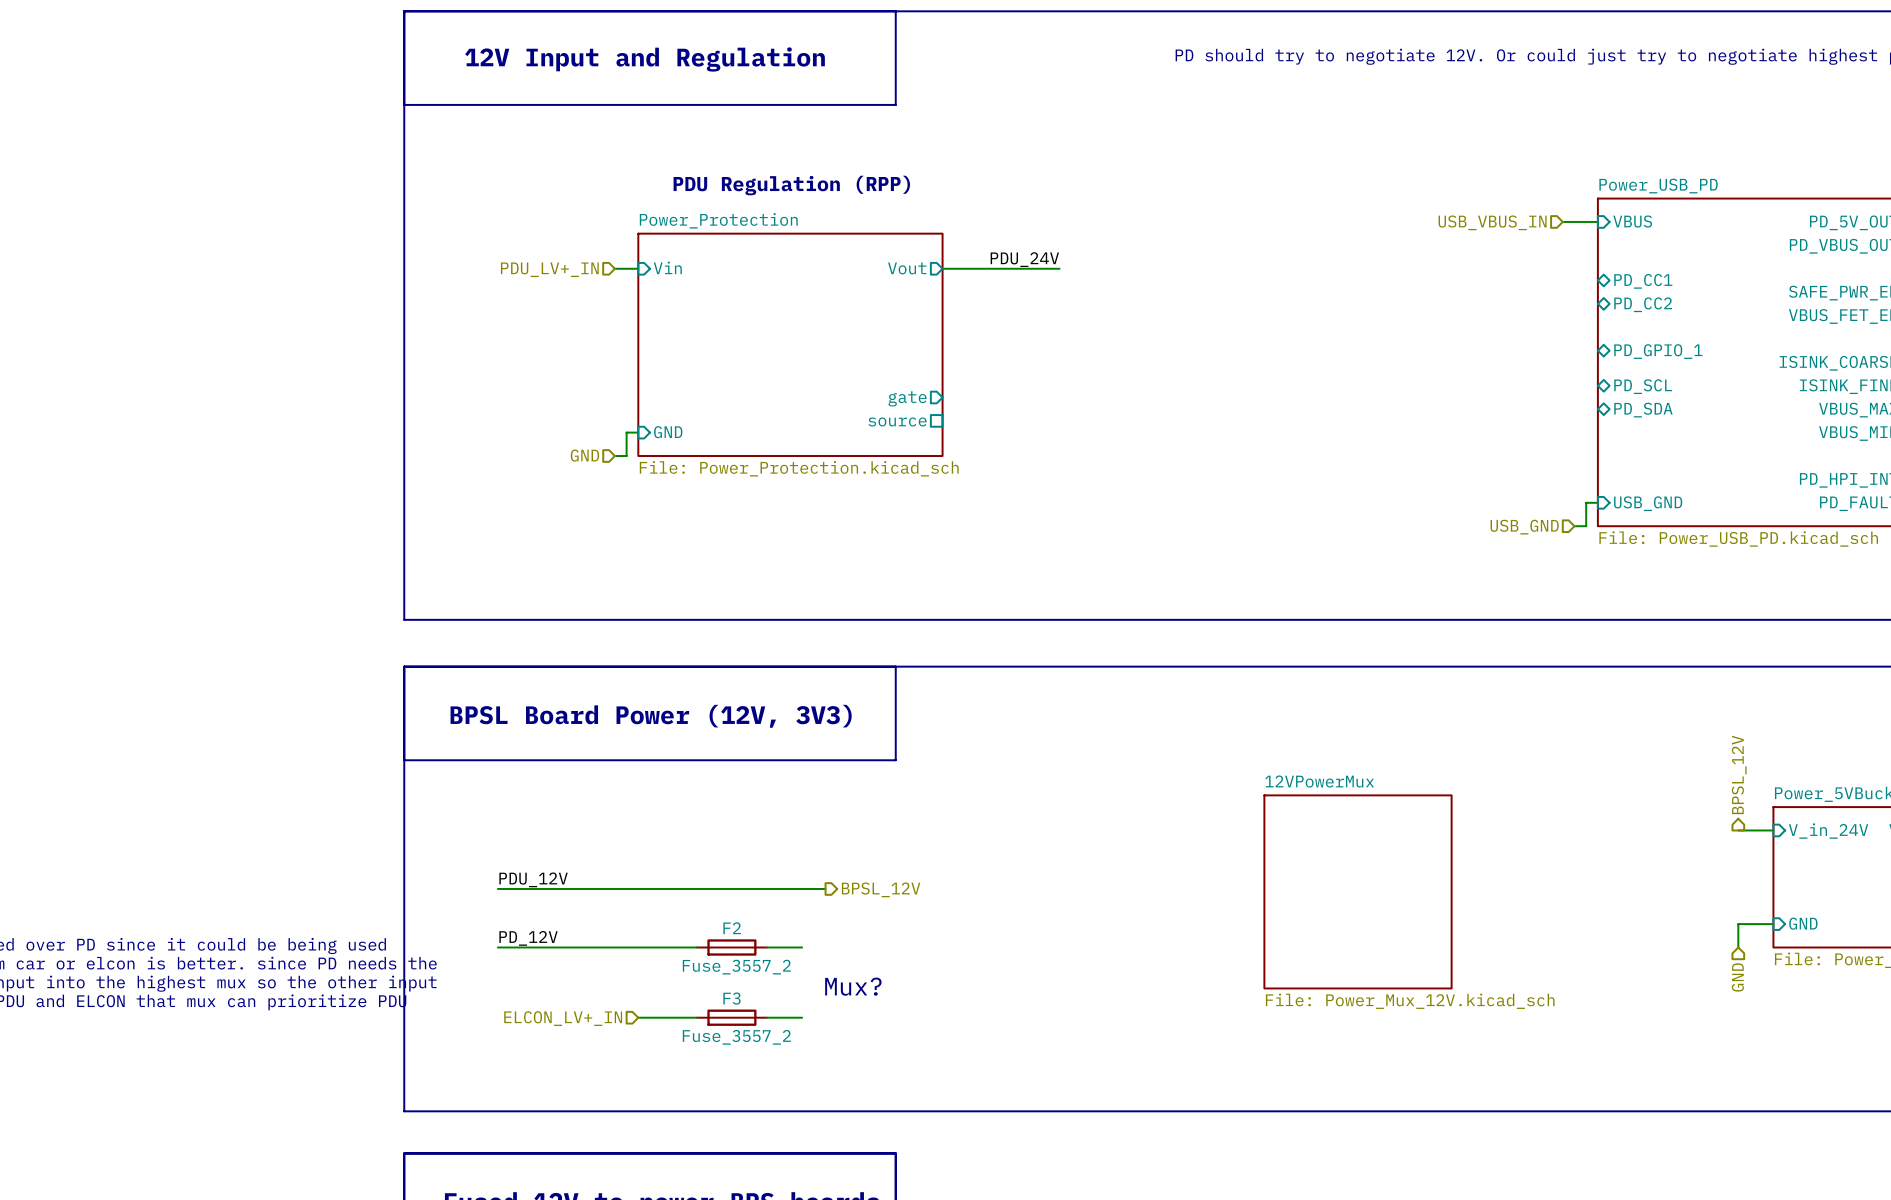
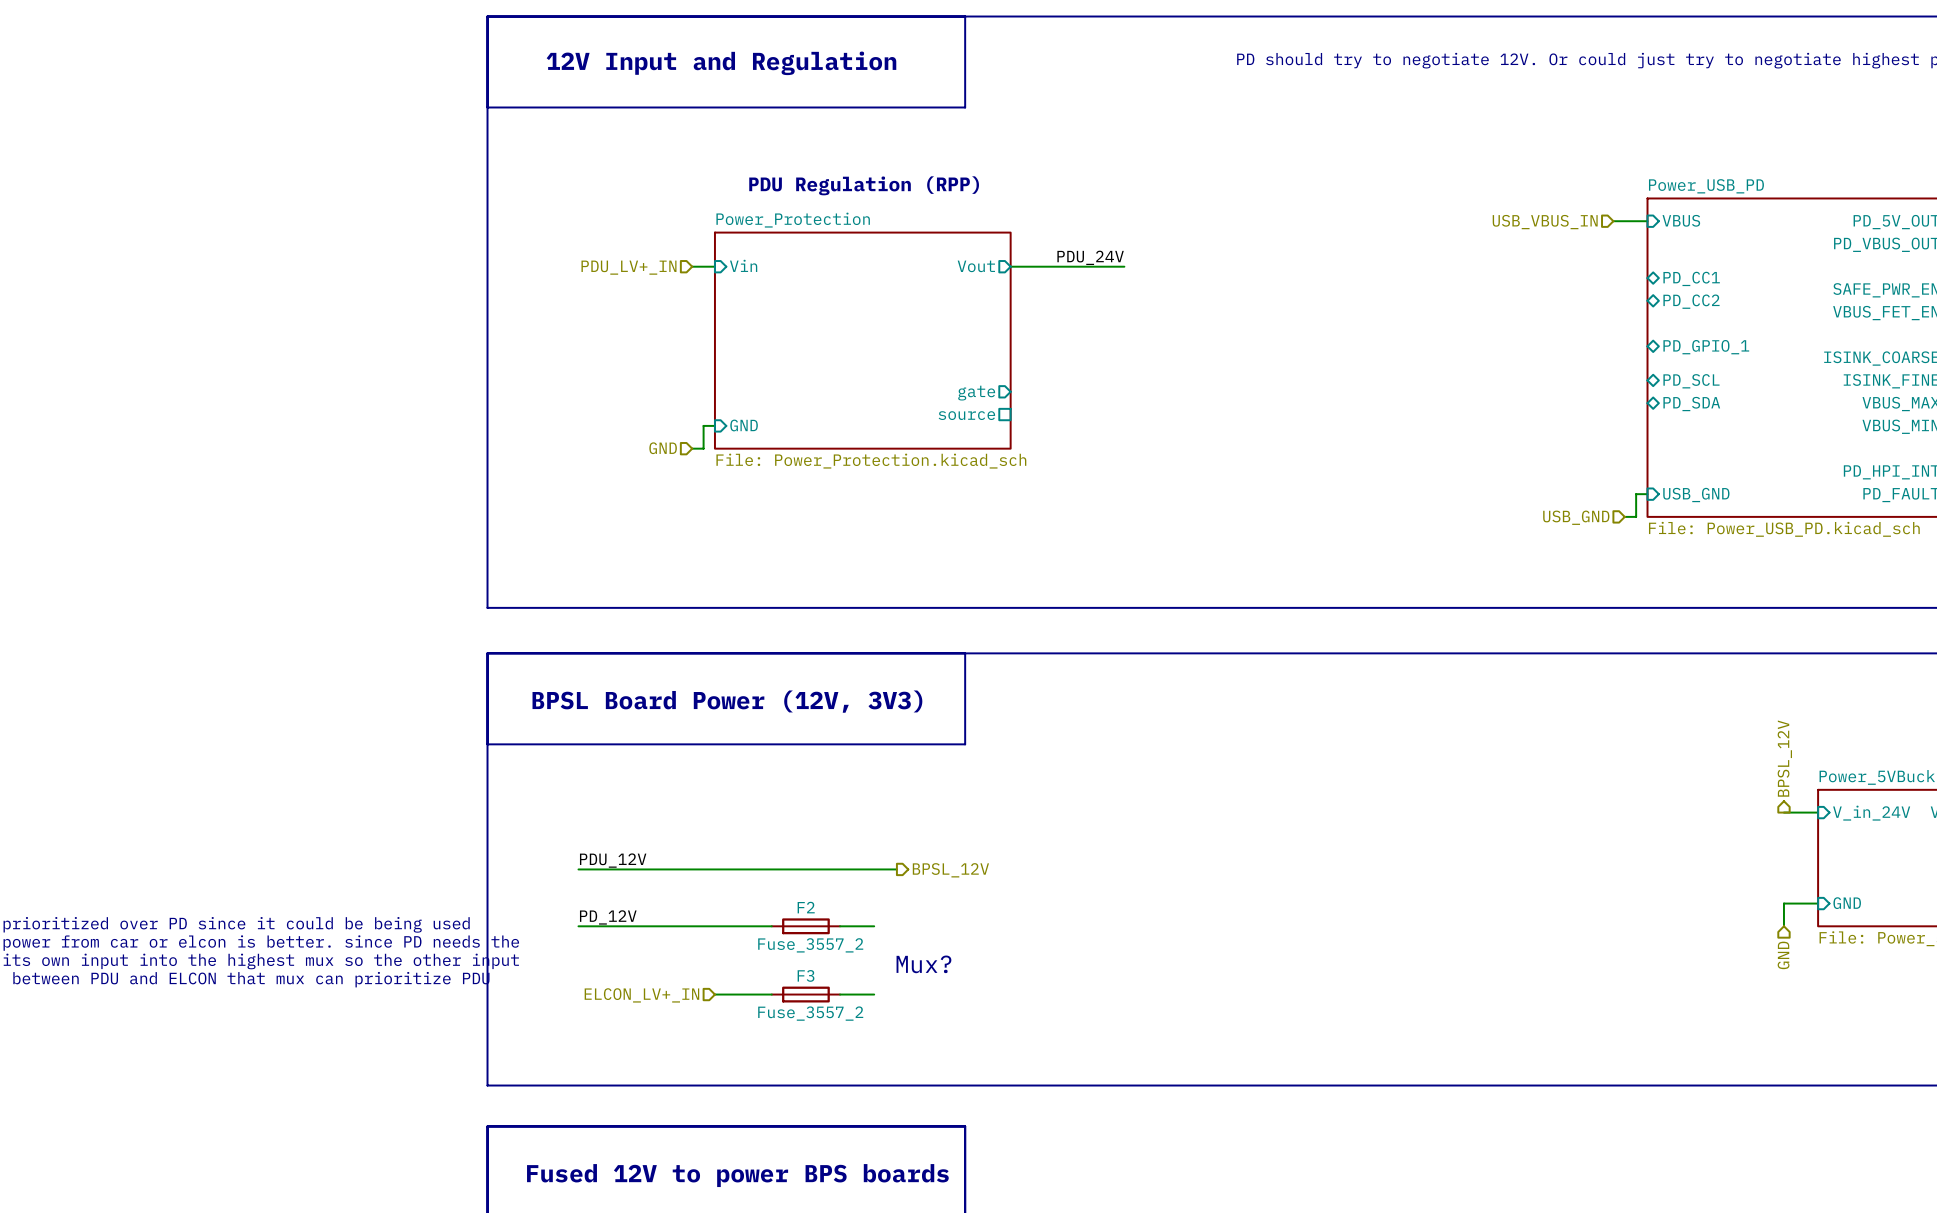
sheet 12VPowerMux: File: Power_Mux_12V.kicad_sch (1358, 891) -> none

